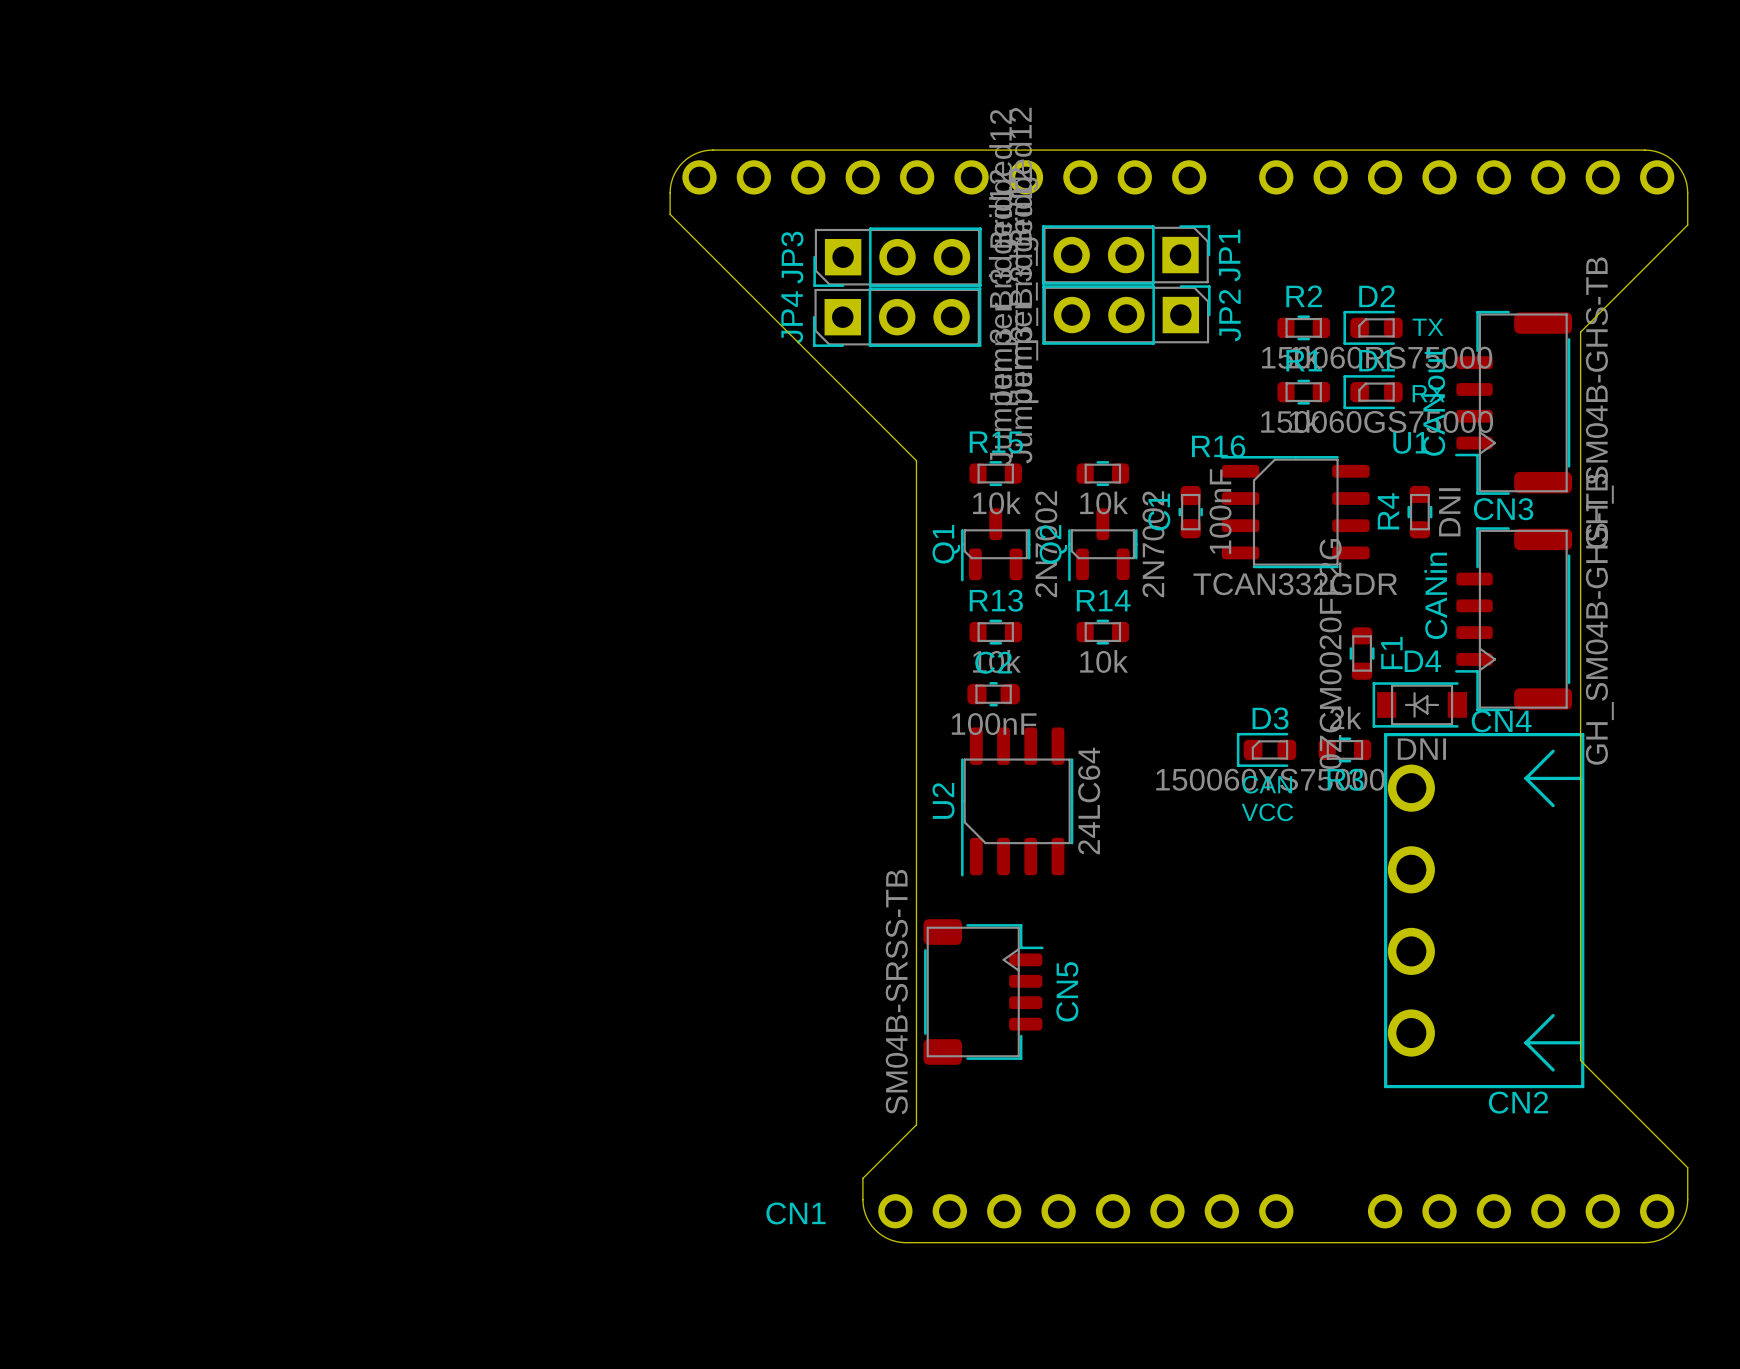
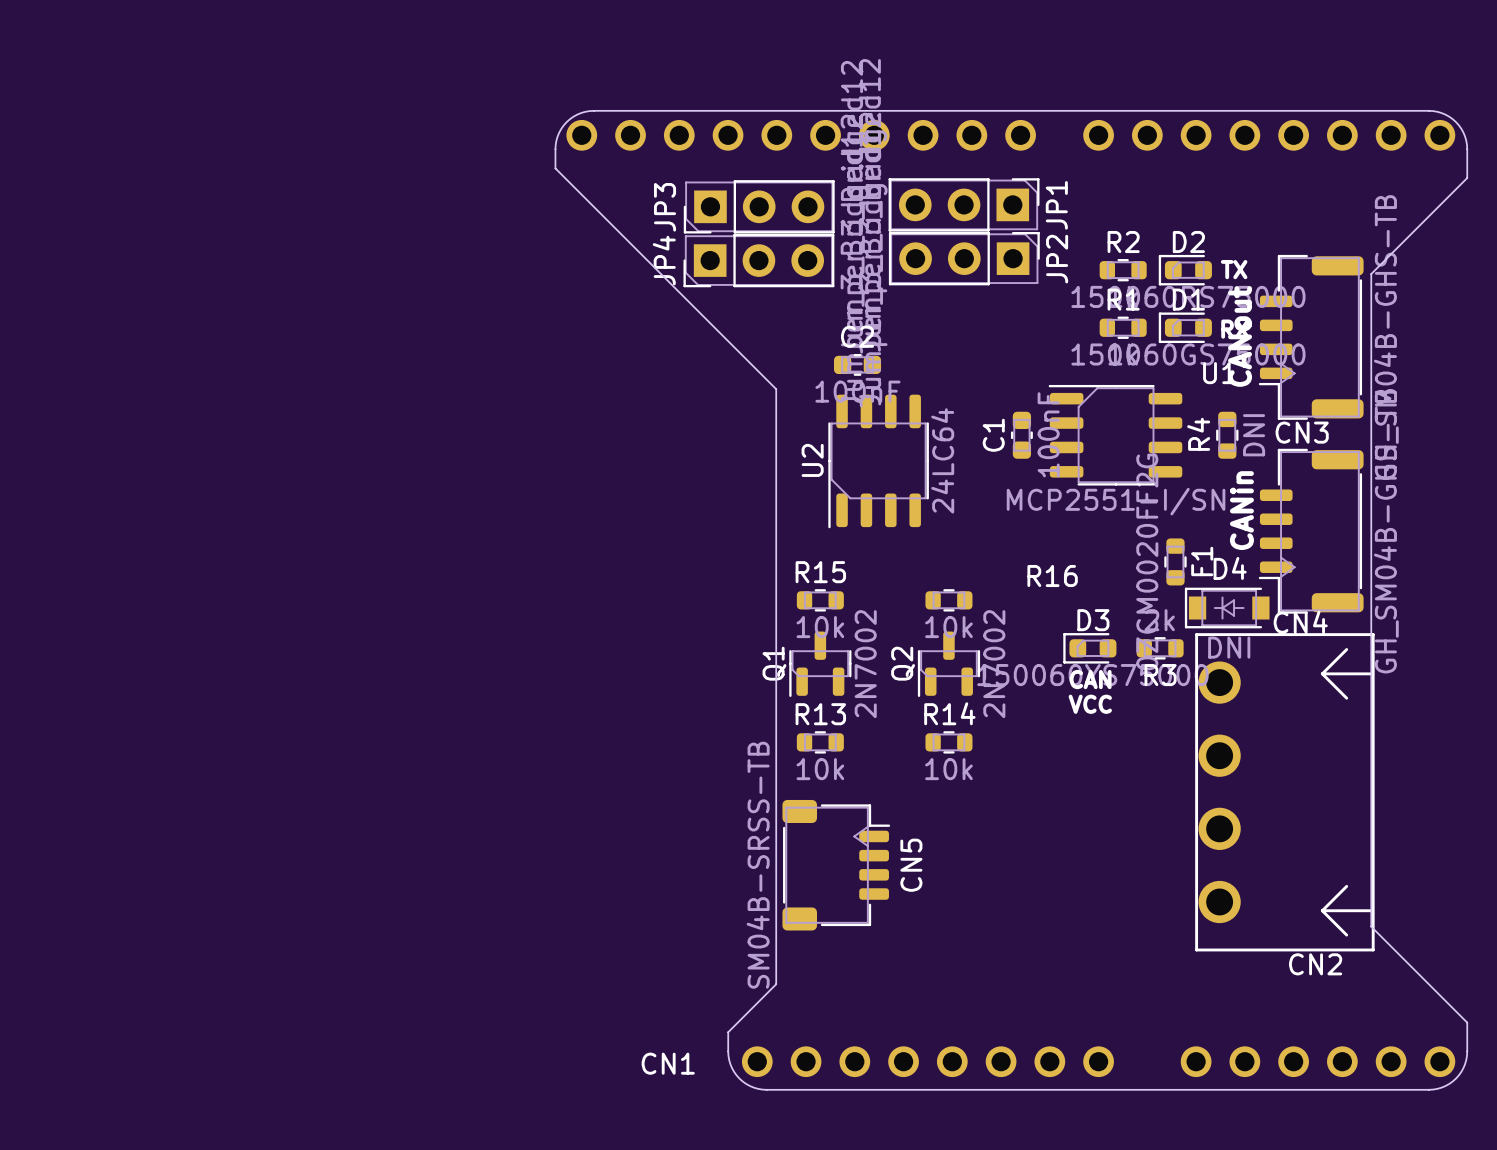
R15 position: (995, 473) -> (820, 600)
R16 position: (1102, 473) -> (948, 600)
Q1 position: (995, 544) -> (820, 664)
Q2 position: (1102, 544) -> (948, 664)
U1 value: TCAN332GDR (1295, 584) -> MCP2551-I/SN (1116, 501)
R13 position: (995, 632) -> (820, 742)
R14 position: (1102, 632) -> (948, 742)
C2 position: (993, 694) -> (857, 364)
U2 position: (1017, 801) -> (878, 461)

